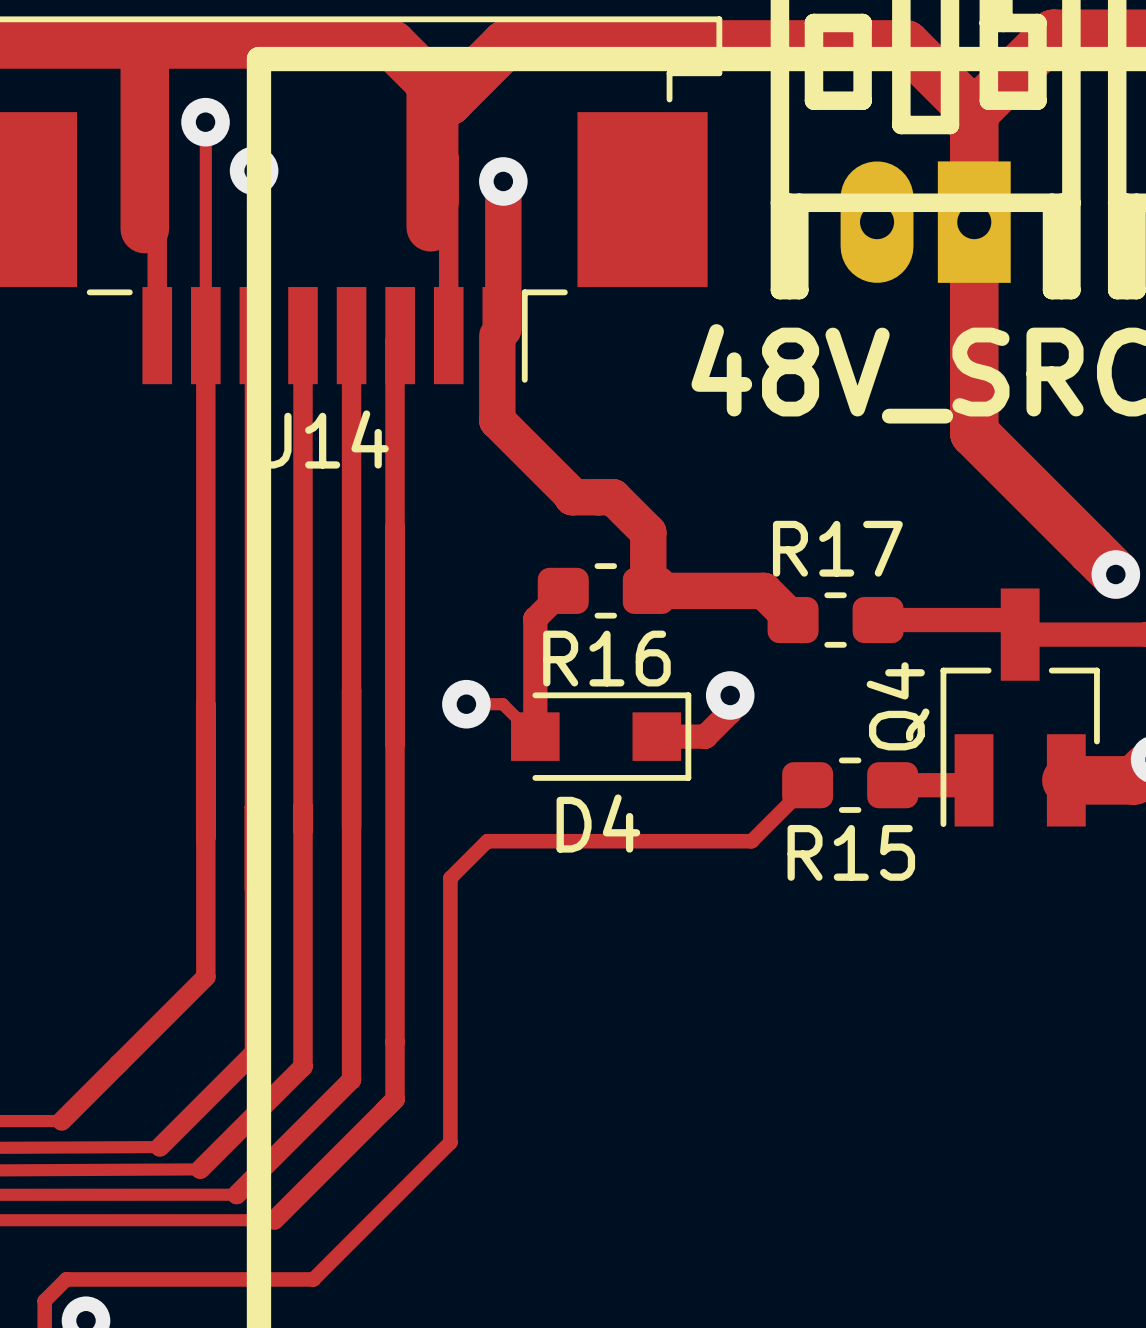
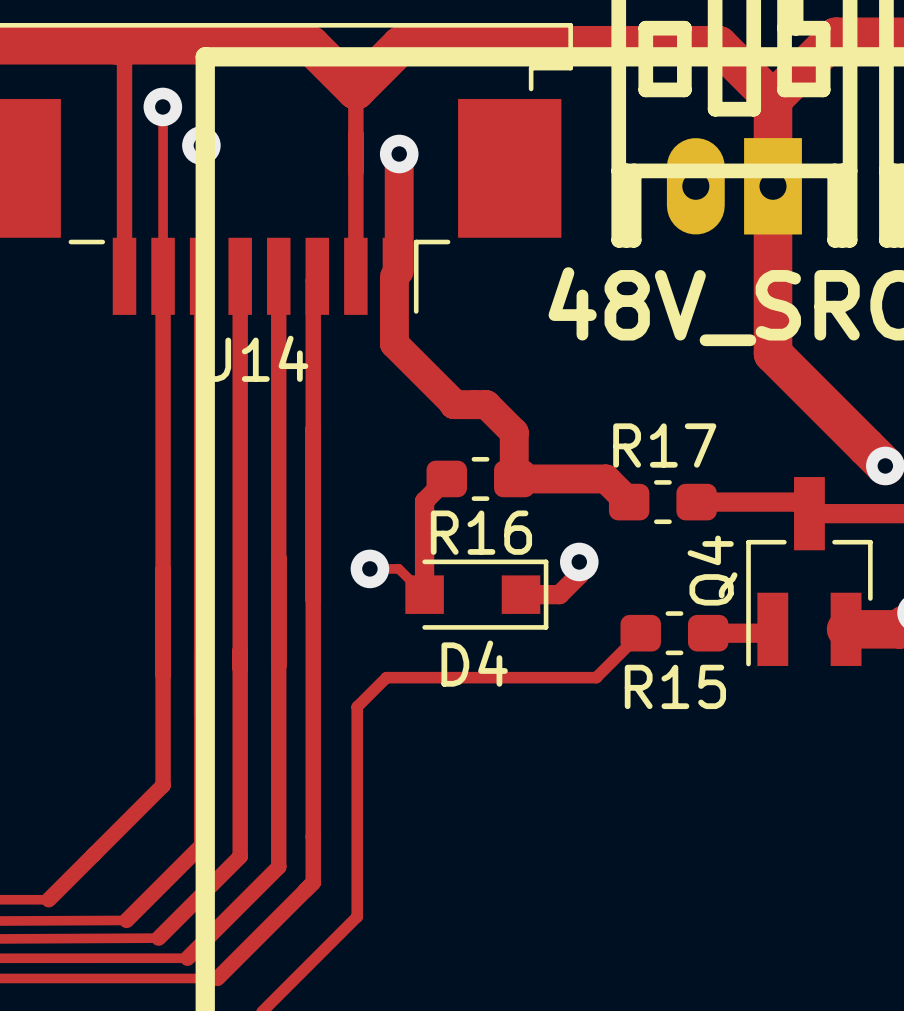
track: (144, 44) (144, 229) -> none
track: (430, 83) (430, 227) -> none

